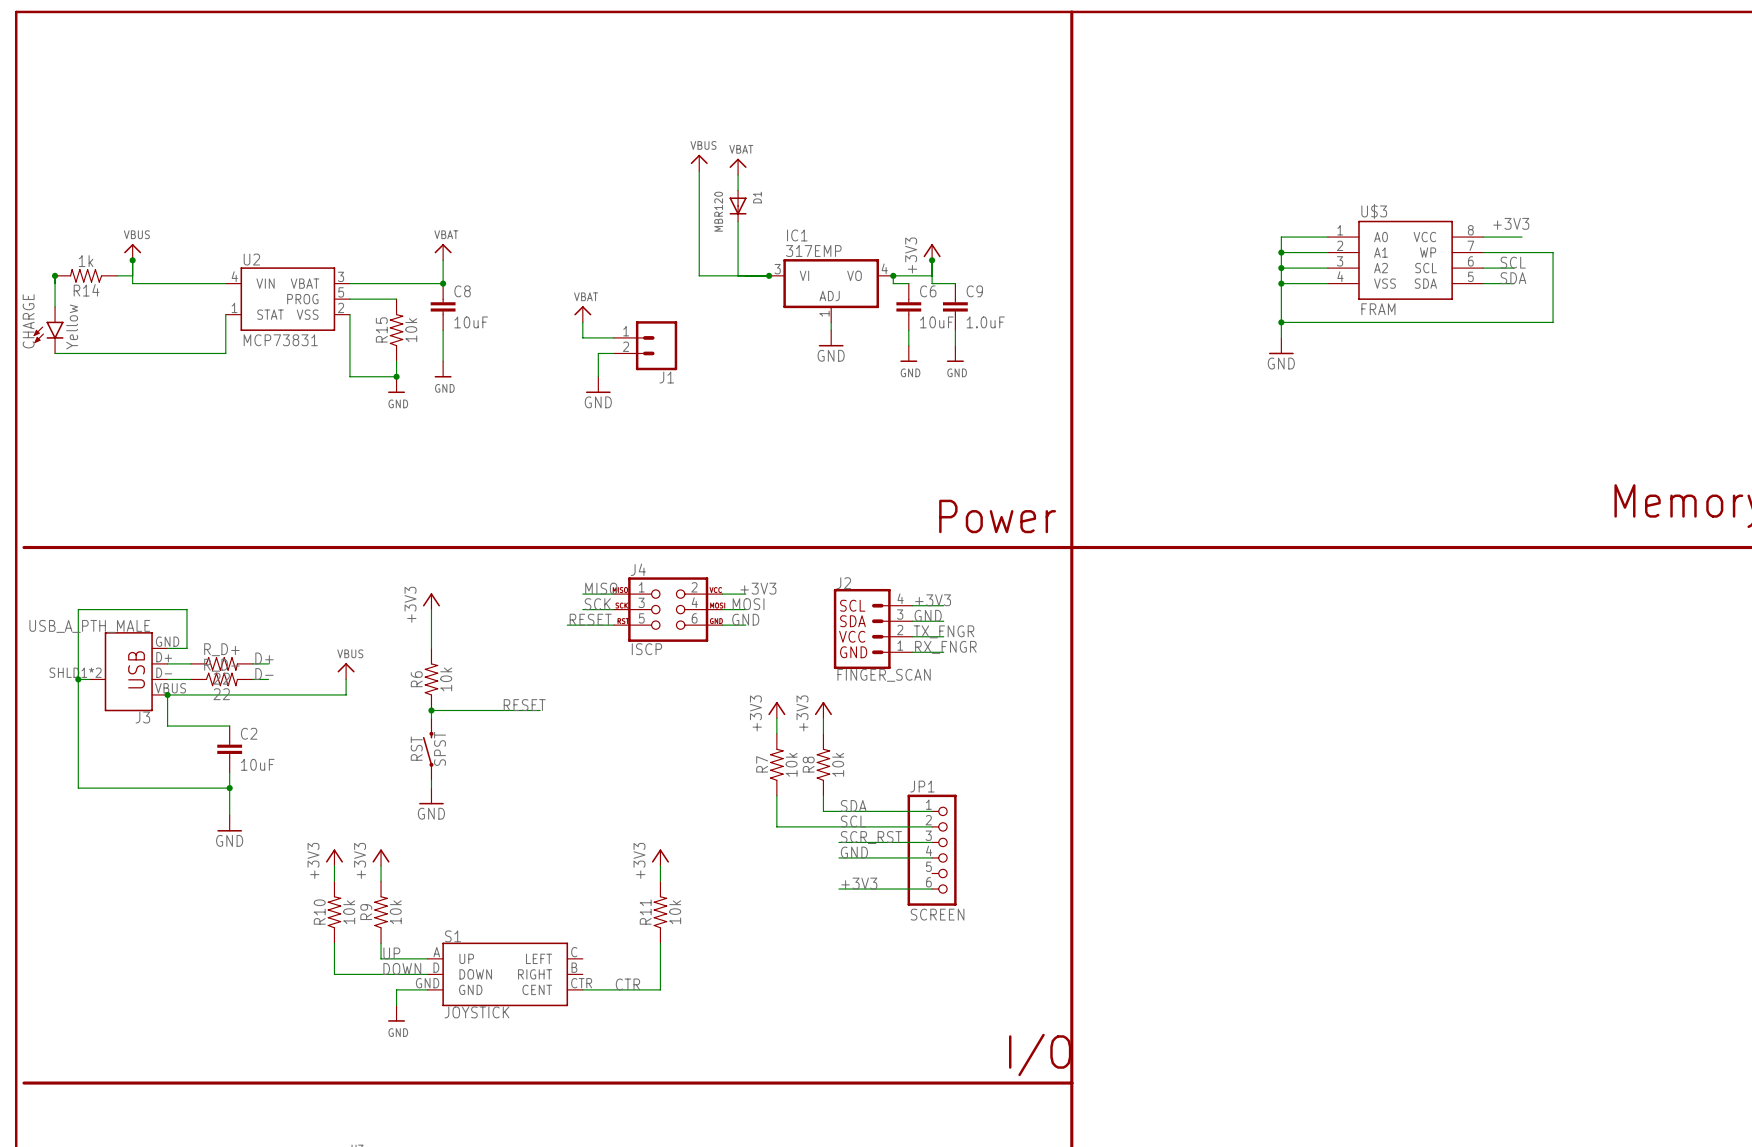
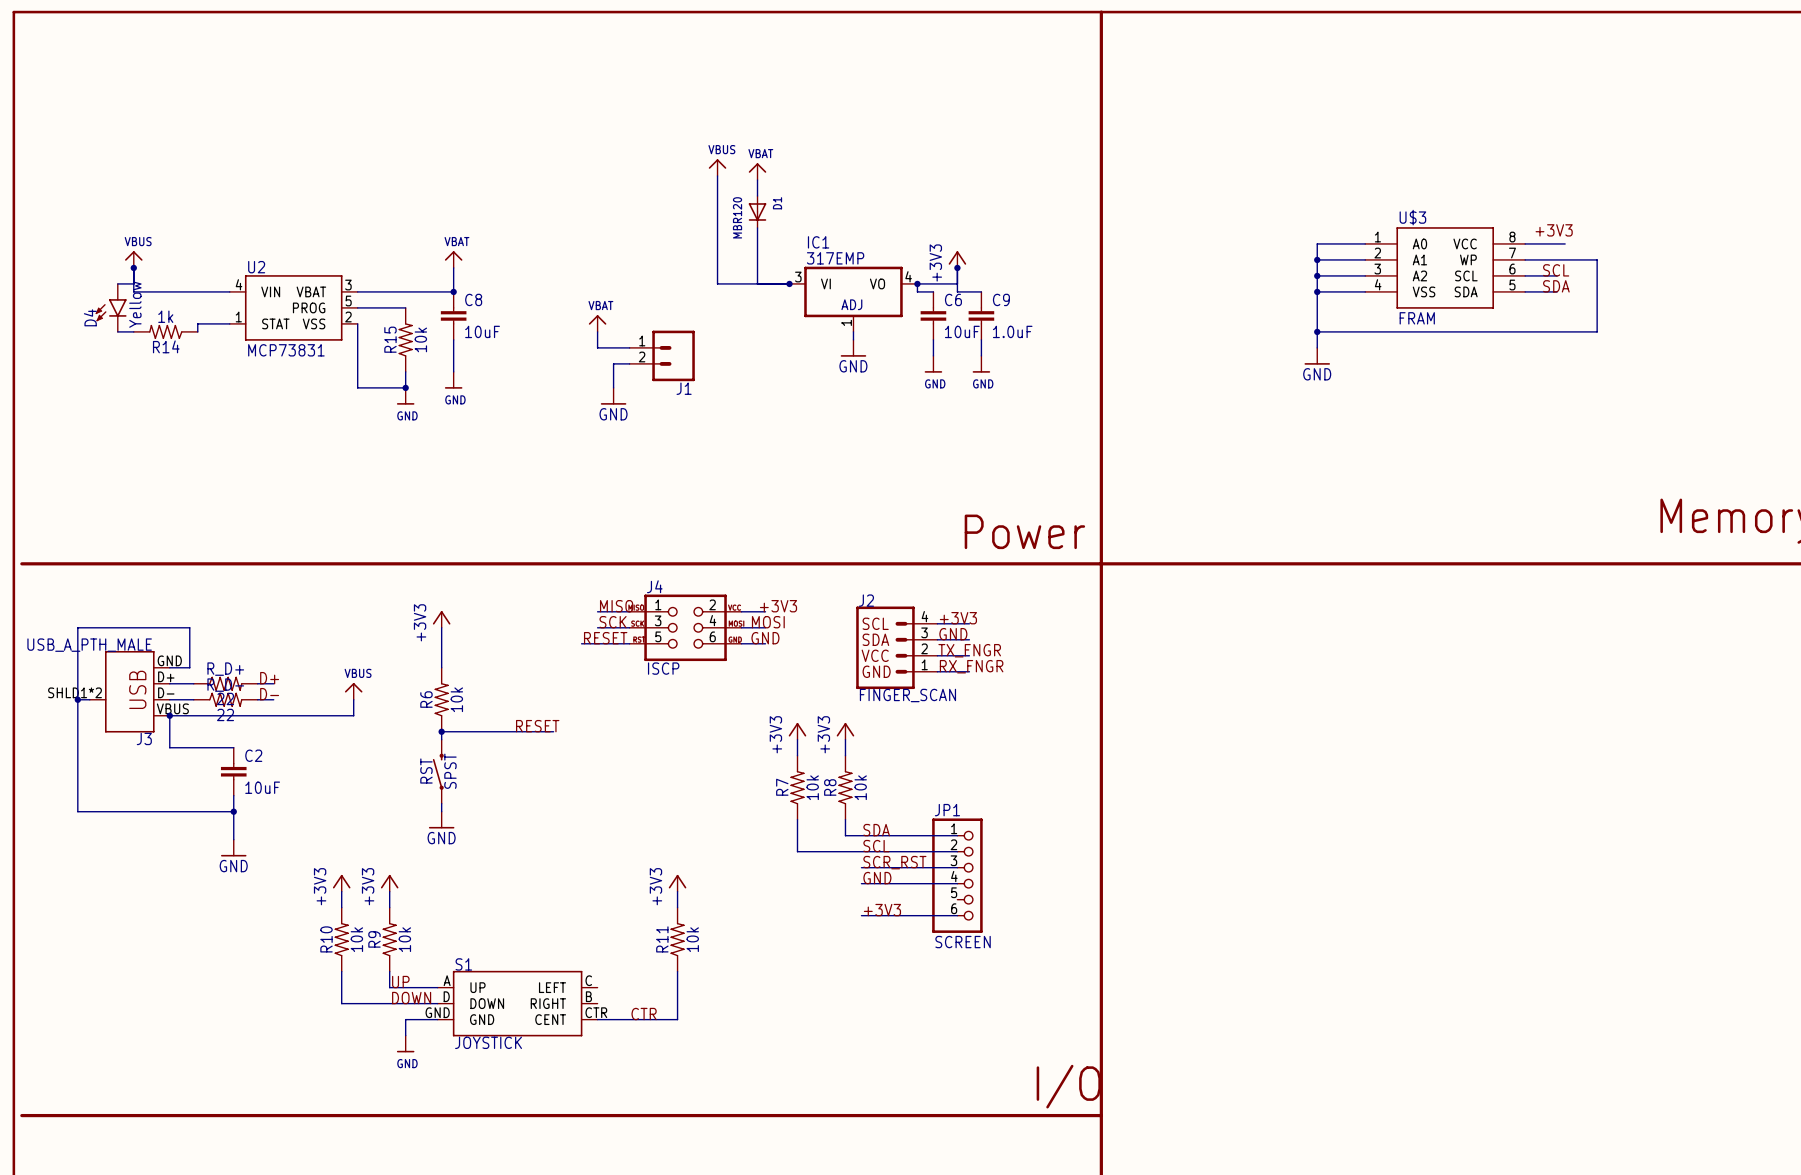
wire: (55, 275) (55, 306) -> none
junction: (55, 275) -> none
R14 position: (86, 275) -> (165, 331)
D4: none -> Yellow (111, 307)
wire: (225, 314) (225, 353) (55, 353) -> (229, 323) (197, 323) (197, 331)
wire: none -> (117, 331) (133, 331)
CHARGE: Yellow (48, 330) -> none

